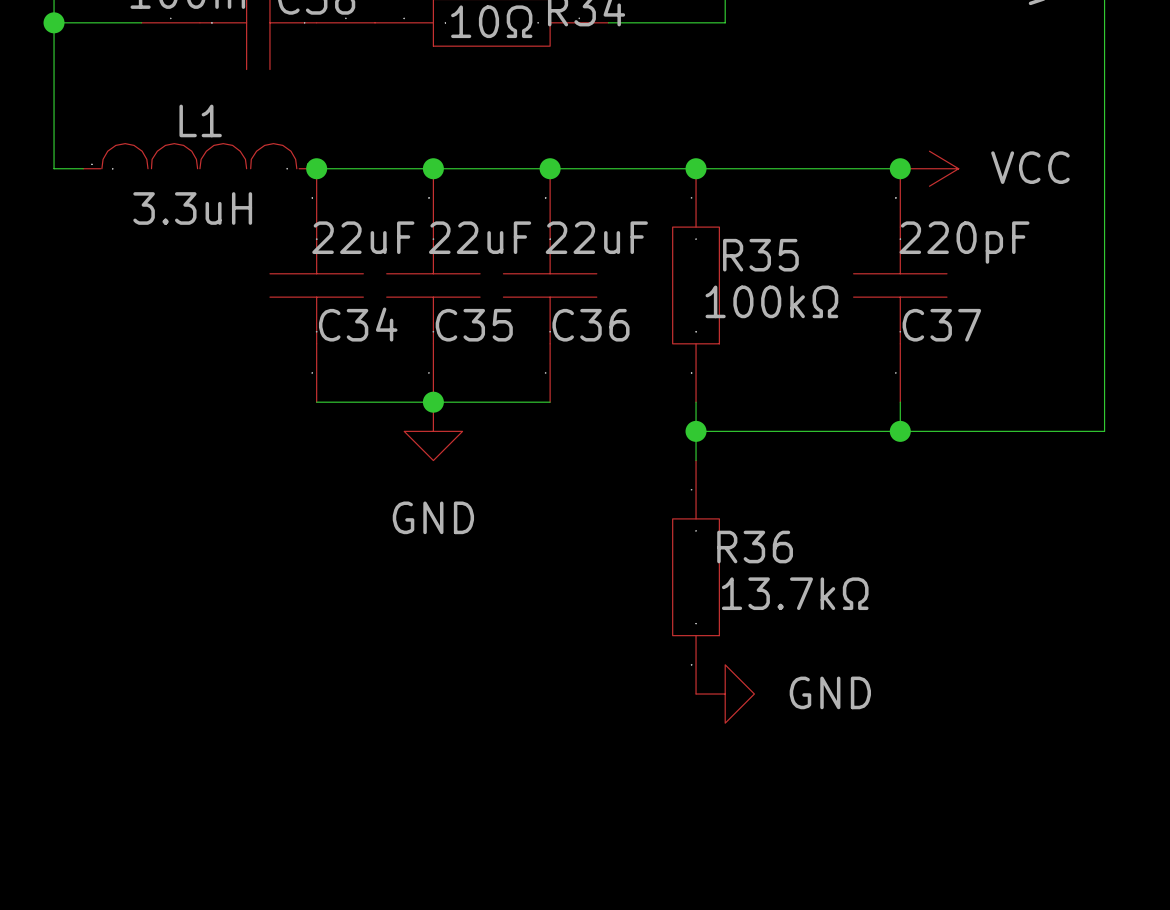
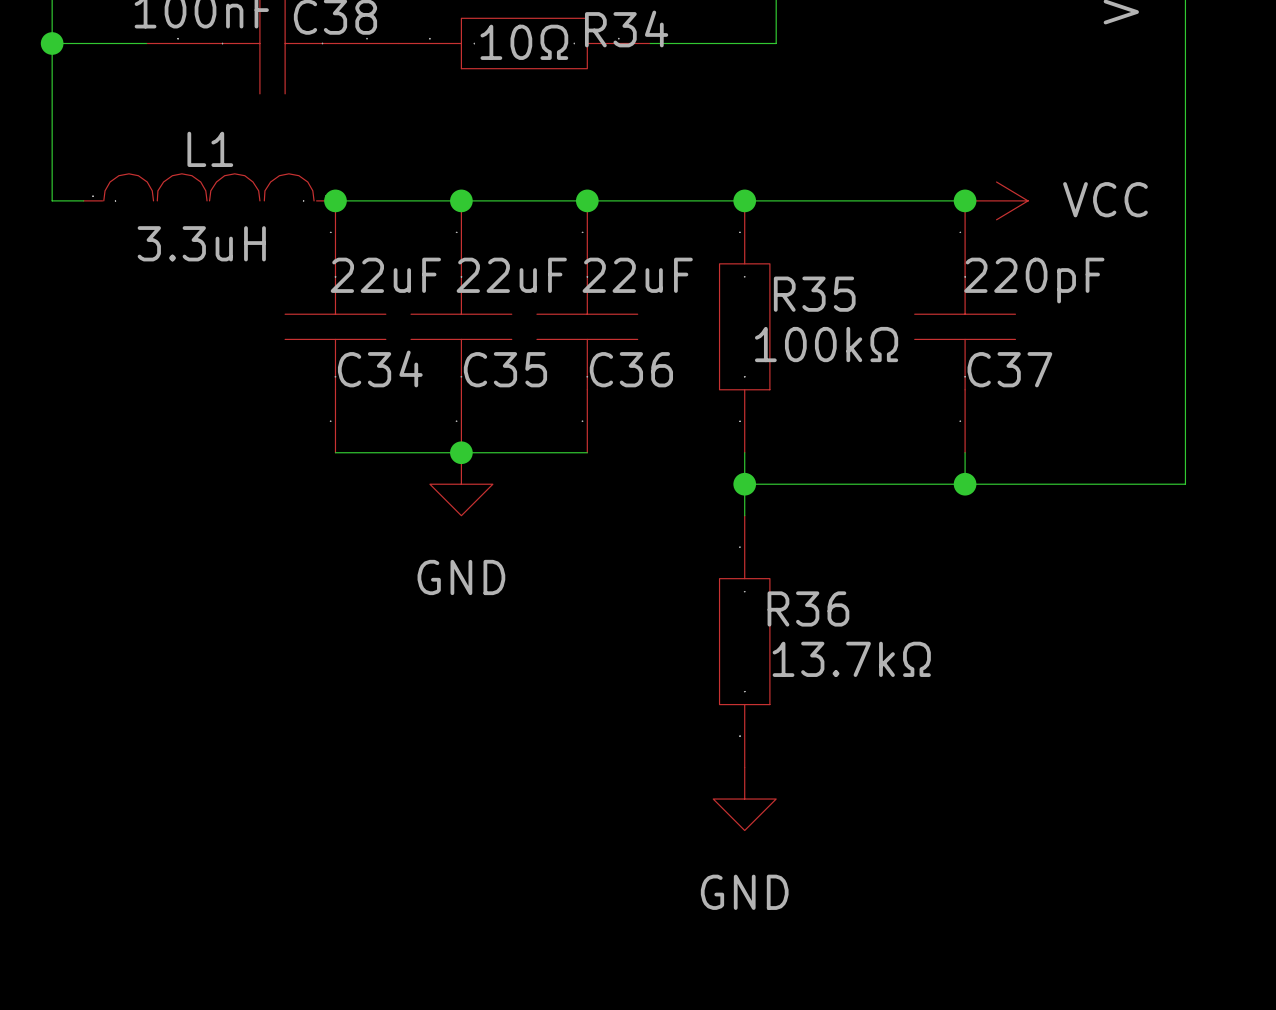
power symbol rotation: 0° (725, 694) -> 90° clockwise (744, 799)
power symbol position: GND (725, 694) -> GND (744, 799)

